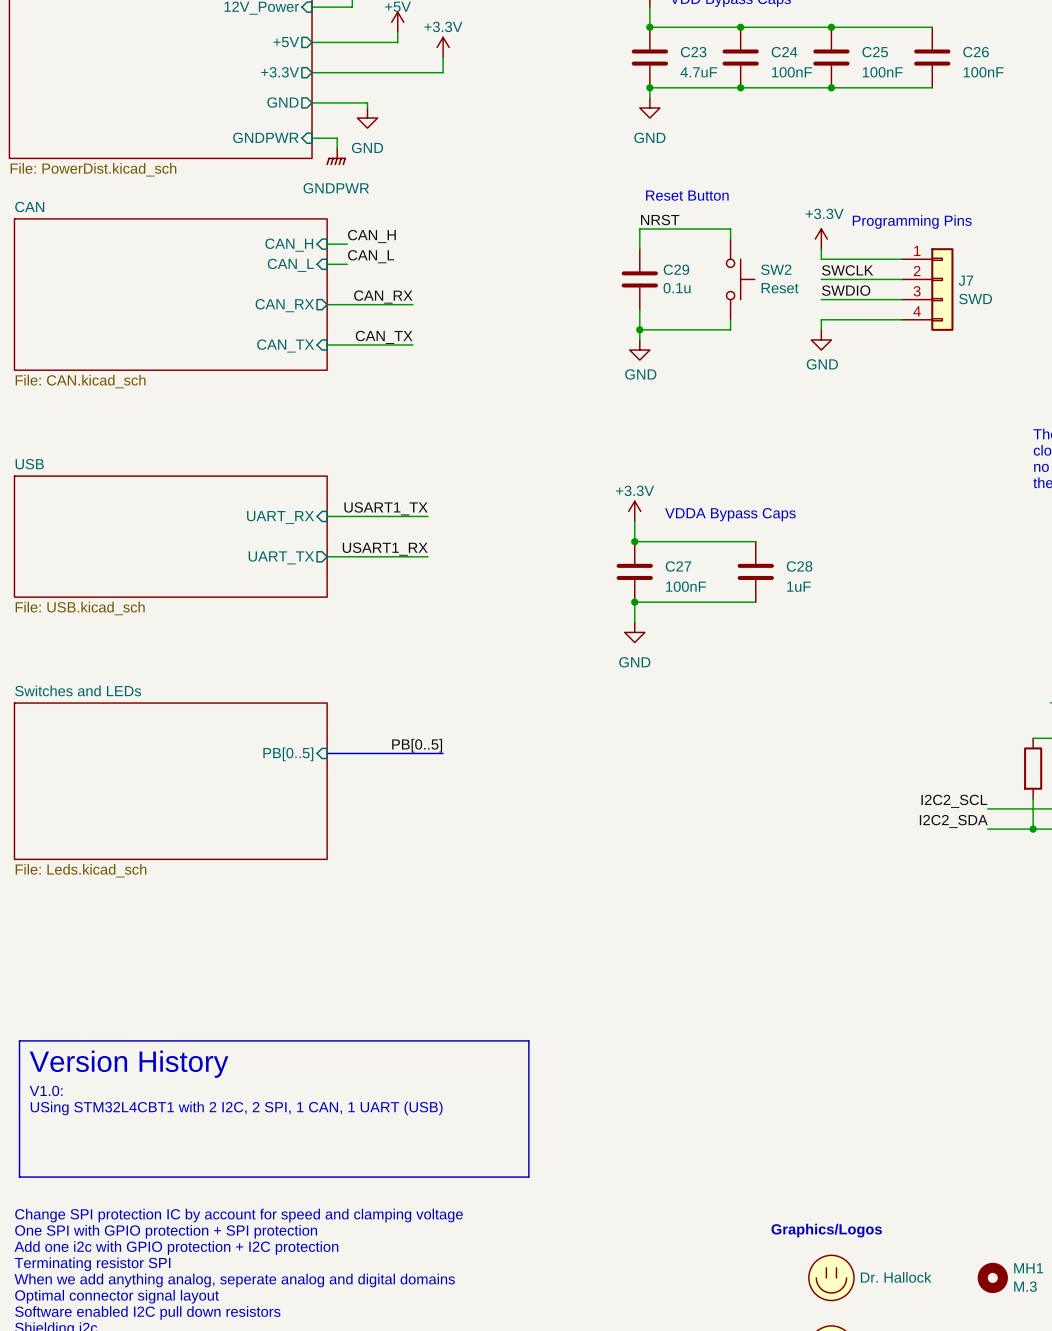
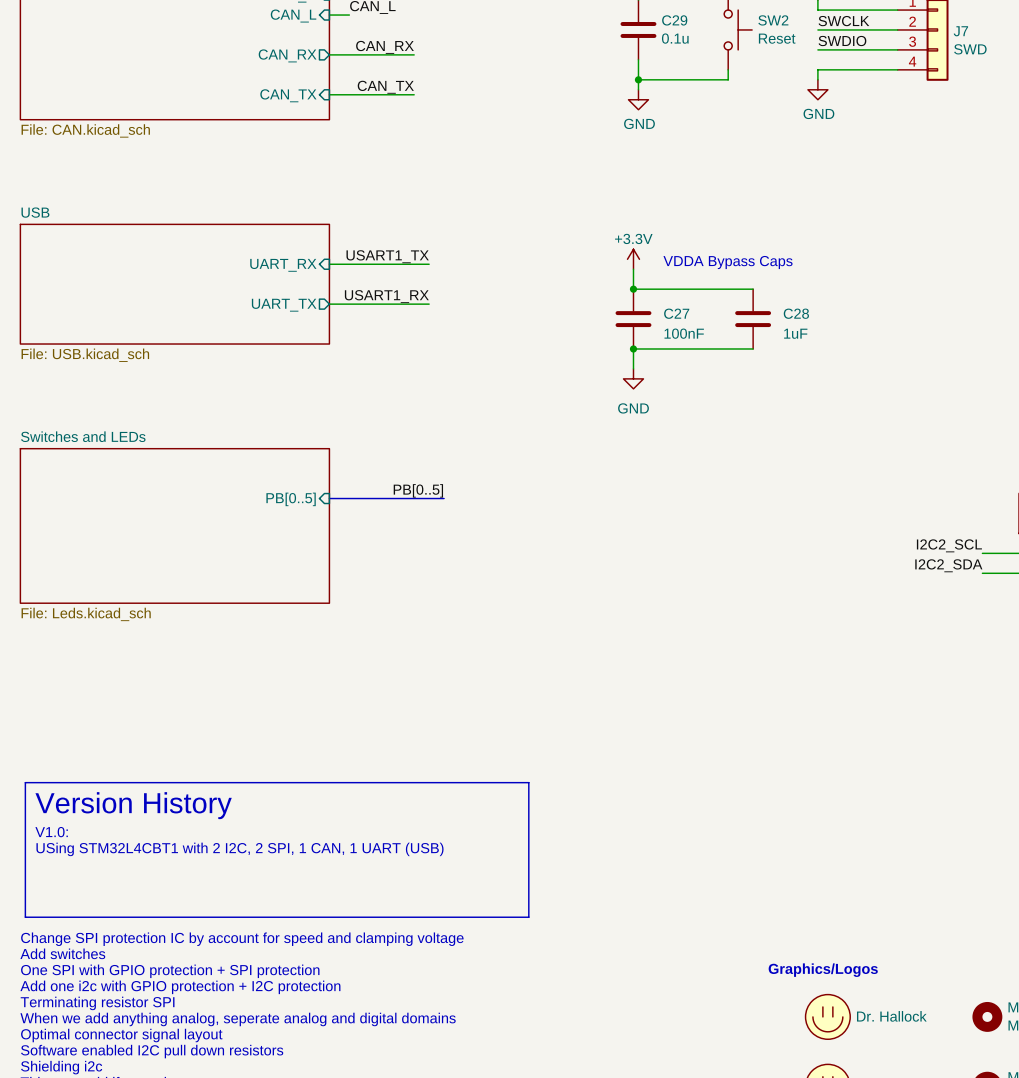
text: none -> Change SPI protection IC by account for speed and clamping voltage (242, 939)
text: Change SPI protection IC by account for speed and clamping voltage (239, 1215) -> Add switches (62, 953)

